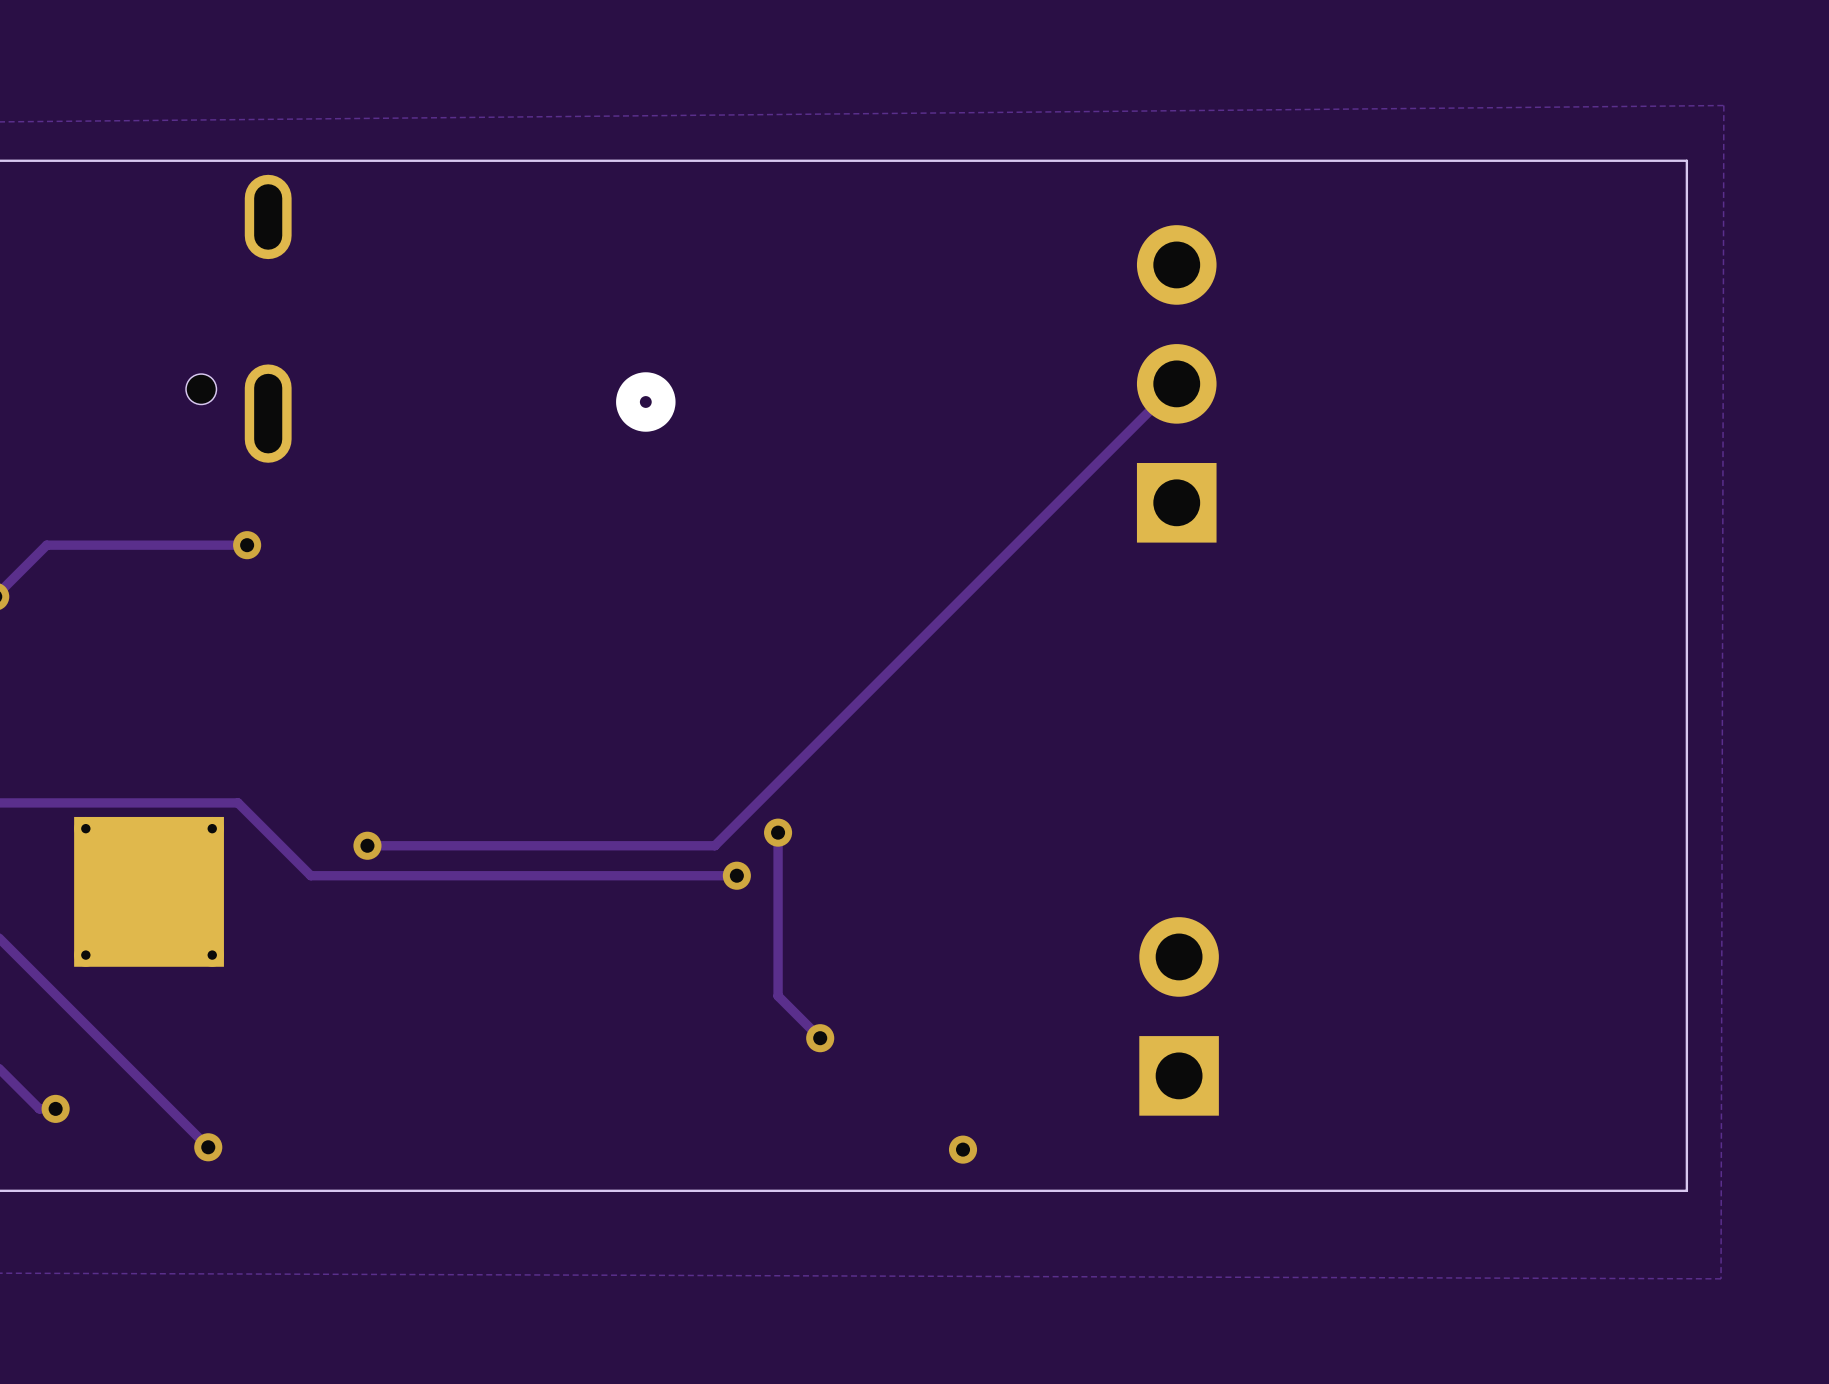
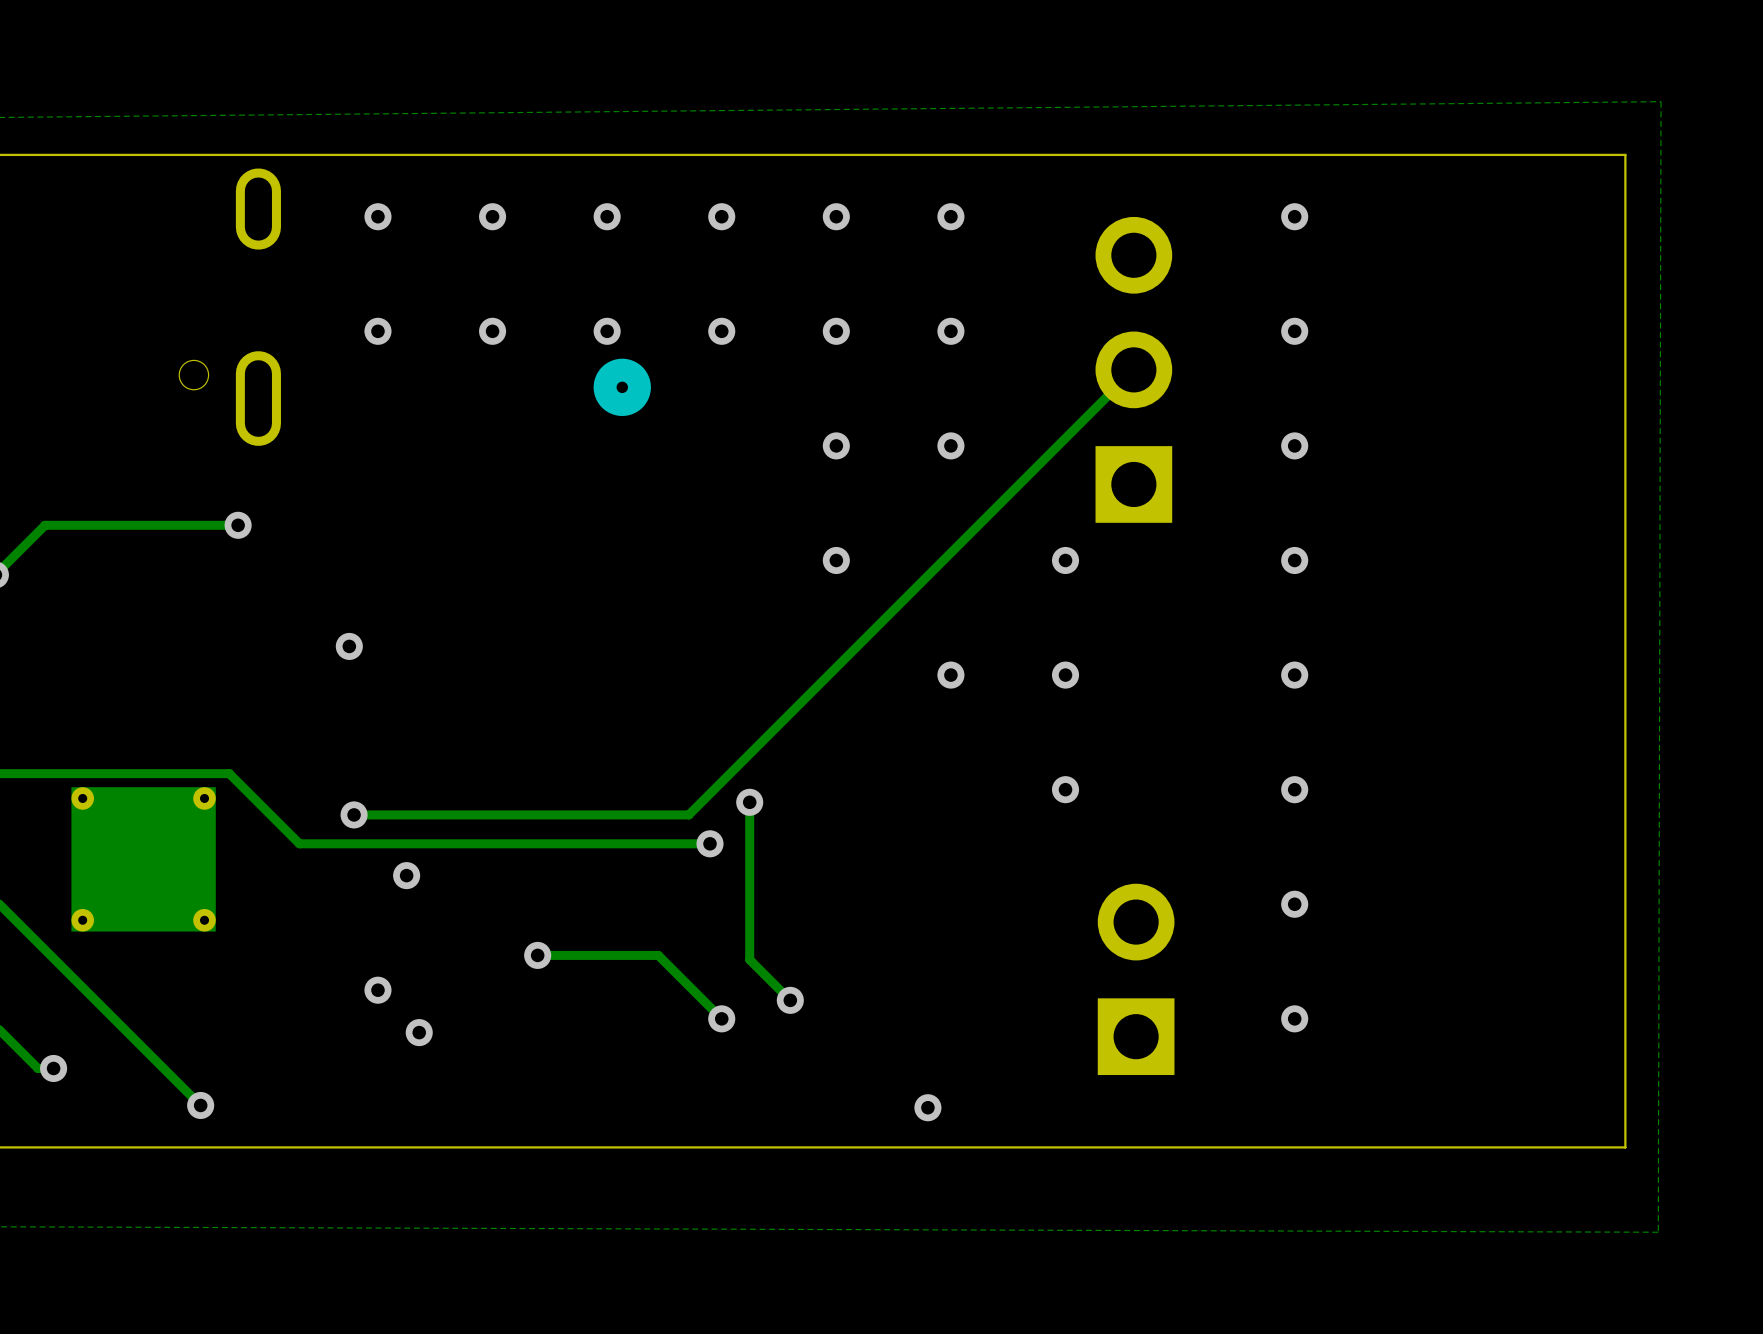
via: none -> (377, 216)
via: none -> (492, 216)
via: none -> (607, 216)
via: none -> (721, 216)
via: none -> (836, 216)
via: none -> (950, 216)
via: none -> (1294, 216)
via: none -> (377, 331)
via: none -> (492, 331)
via: none -> (607, 331)
via: none -> (721, 331)
via: none -> (836, 331)
via: none -> (950, 331)
via: none -> (1294, 331)
via: none -> (836, 445)
via: none -> (950, 445)
via: none -> (1294, 445)
via: none -> (836, 560)
via: none -> (1065, 560)
via: none -> (1294, 560)
via: none -> (349, 646)
via: none -> (950, 675)
via: none -> (1065, 675)
via: none -> (1294, 675)
via: none -> (1065, 789)
via: none -> (1294, 789)
via: none -> (406, 875)
via: none -> (1294, 904)
track: none -> (537, 955) (658, 955) (721, 1018)
via: none -> (537, 955)
via: none -> (377, 990)
via: none -> (721, 1018)
via: none -> (1294, 1018)
via: none -> (419, 1032)

